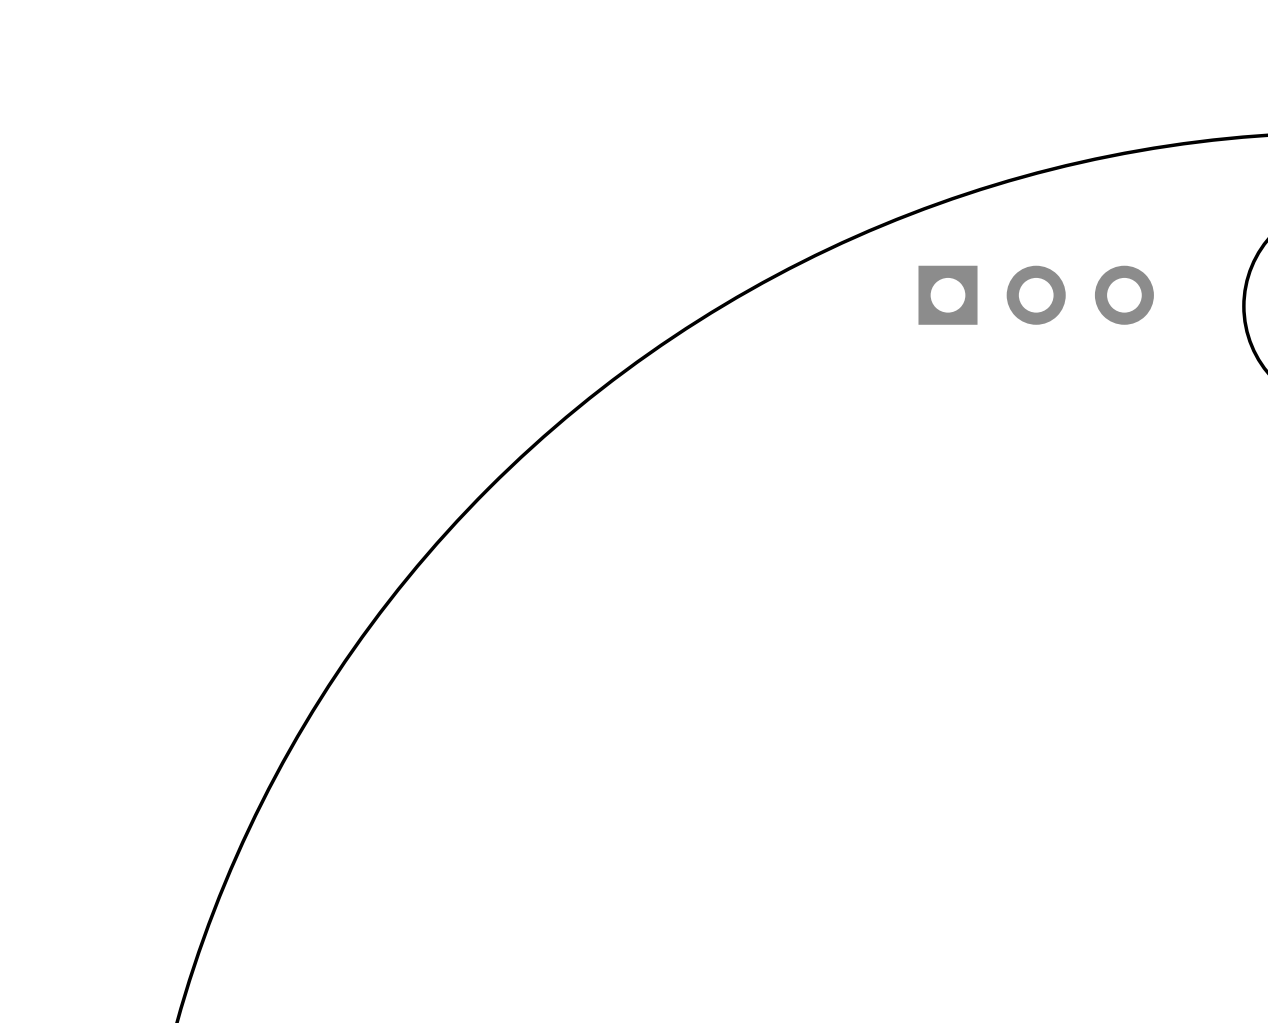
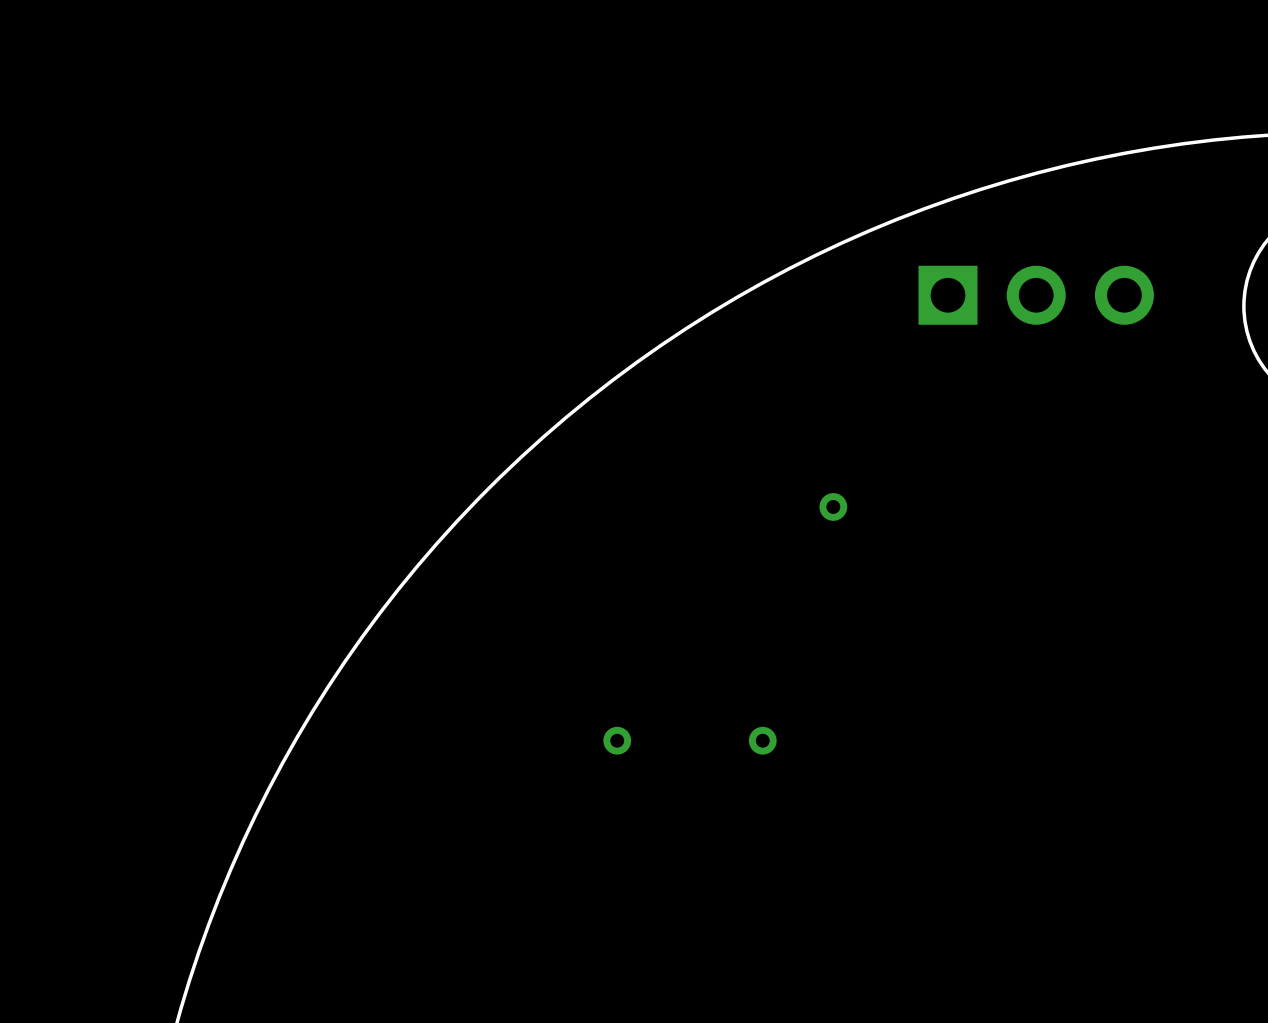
via: none -> (833, 506)
via: none -> (617, 740)
via: none -> (762, 740)

